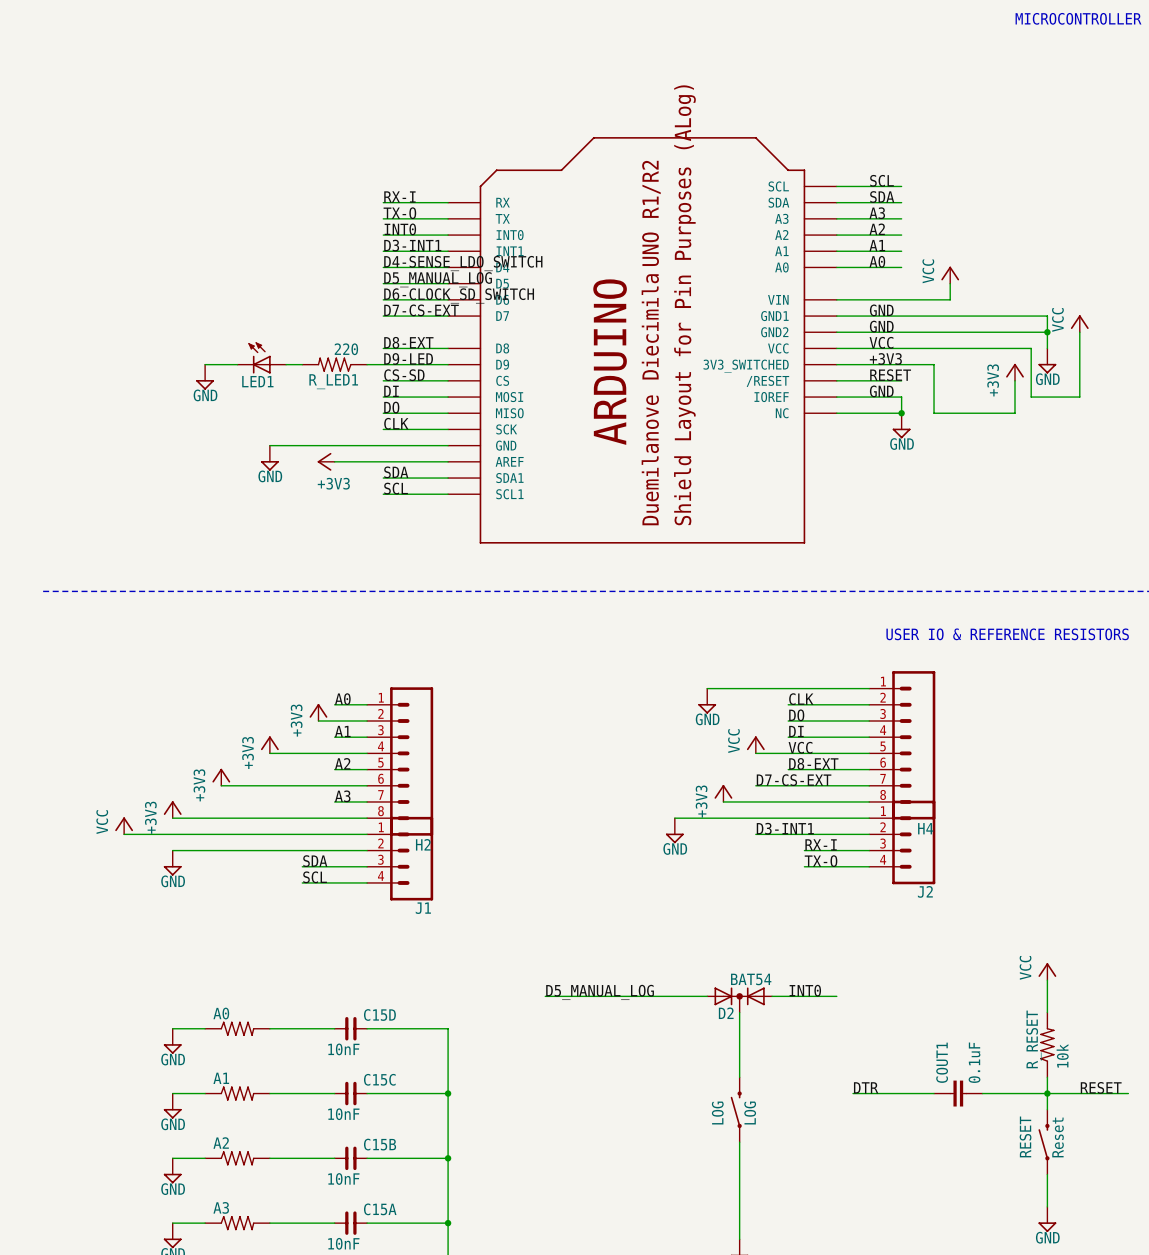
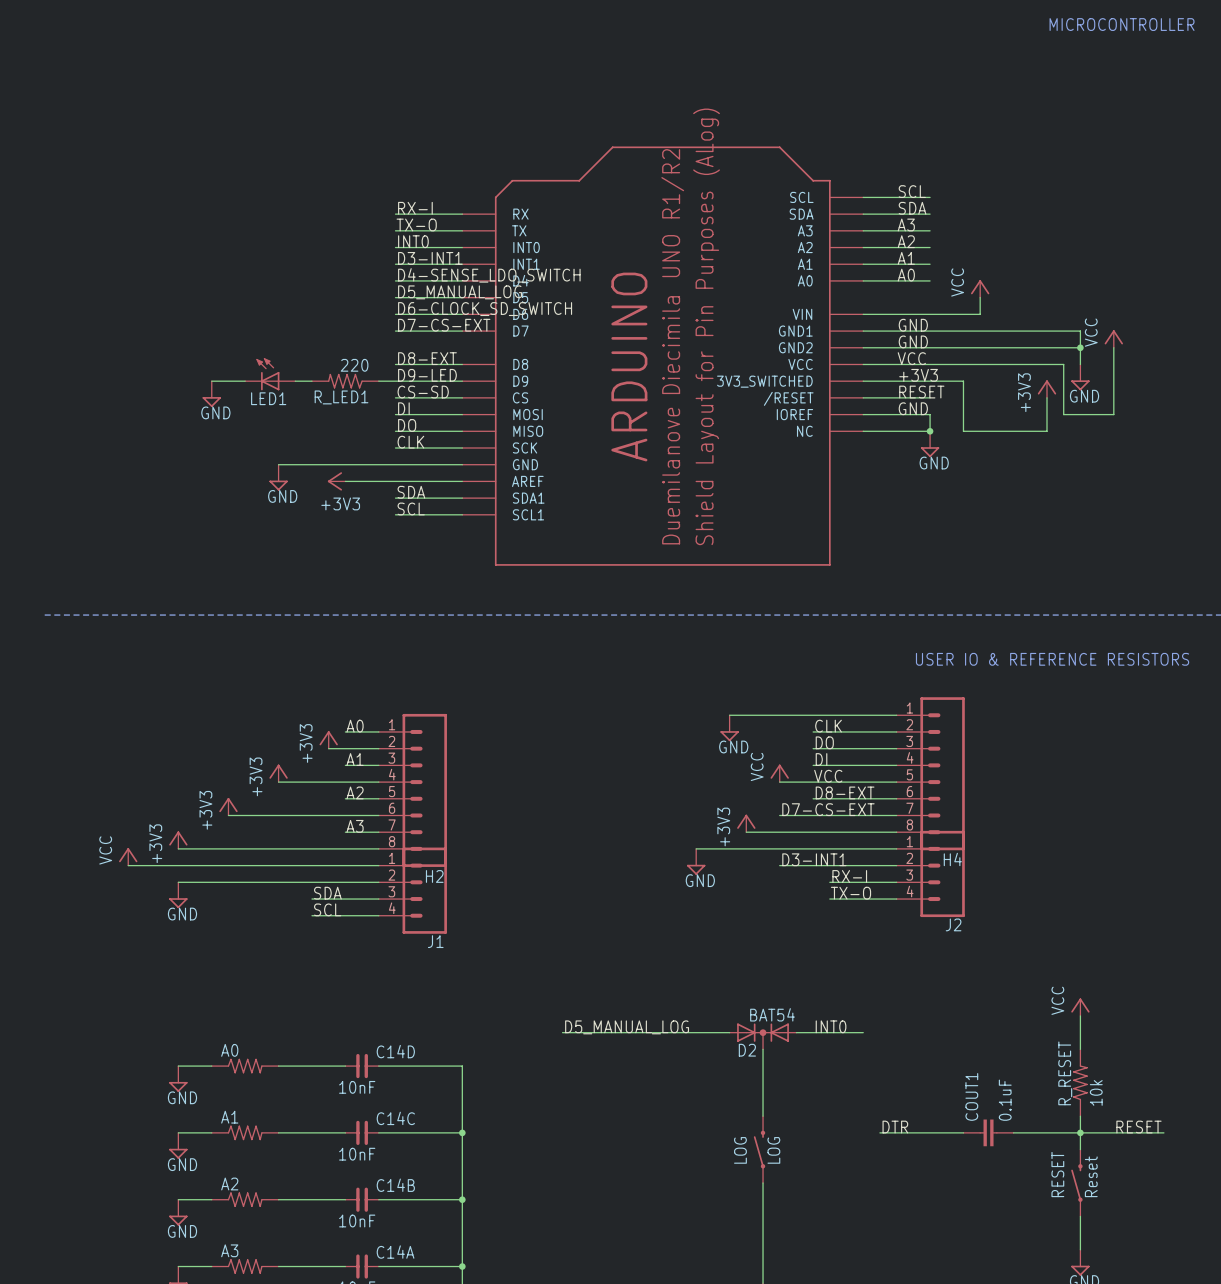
C15D name: C15D (379, 1014) -> C14D (395, 1051)
C15C name: C15C (379, 1079) -> C14C (395, 1118)
C15B name: C15B (380, 1144) -> C14B (395, 1185)
C15A name: C15A (380, 1209) -> C14A (395, 1252)

